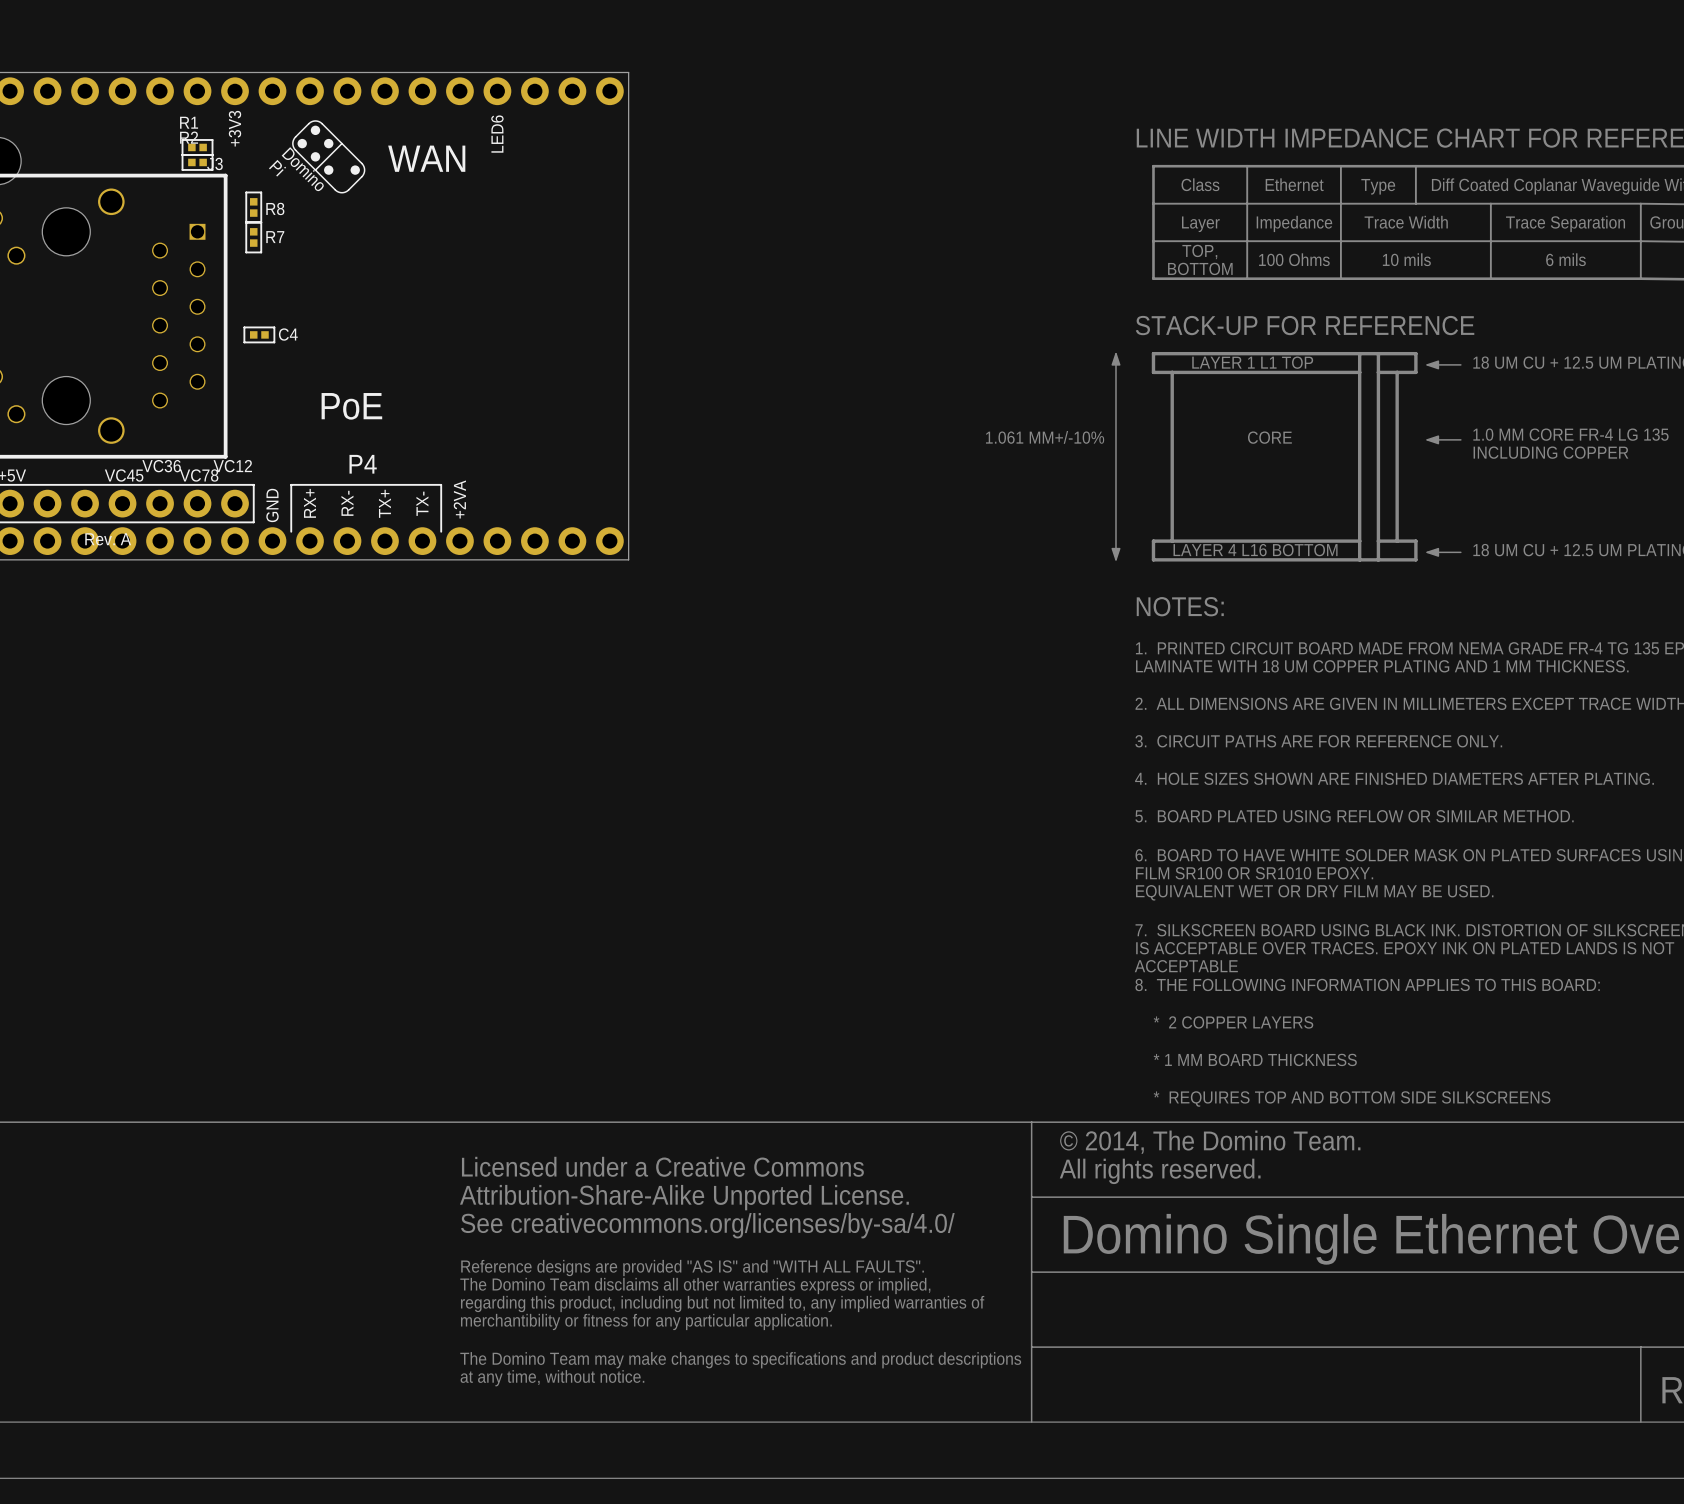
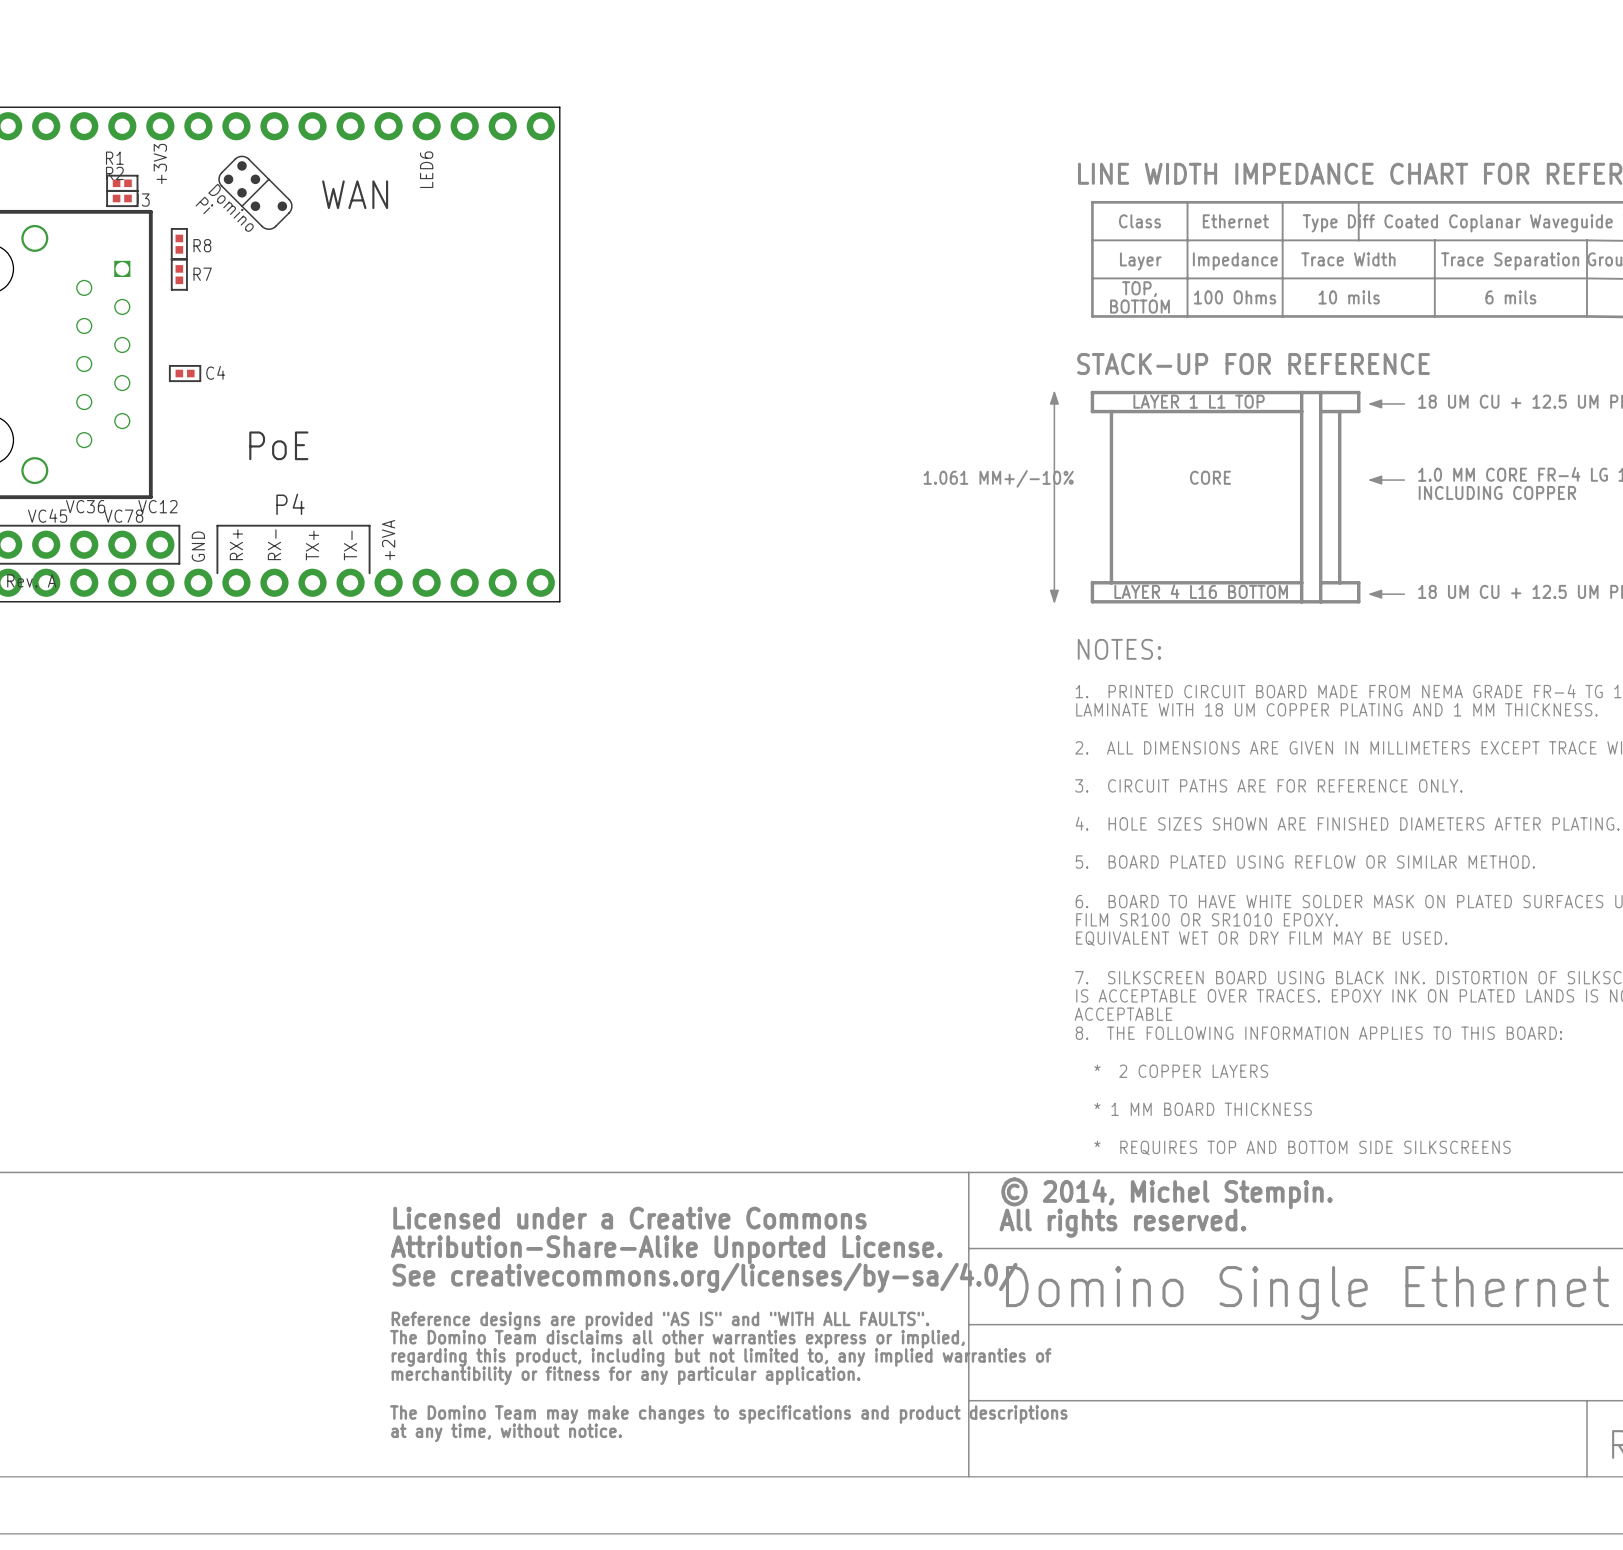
text: © 2014, The Domino Team. (1210, 1142) -> © 2014, Michel Stempin. (1166, 1193)

